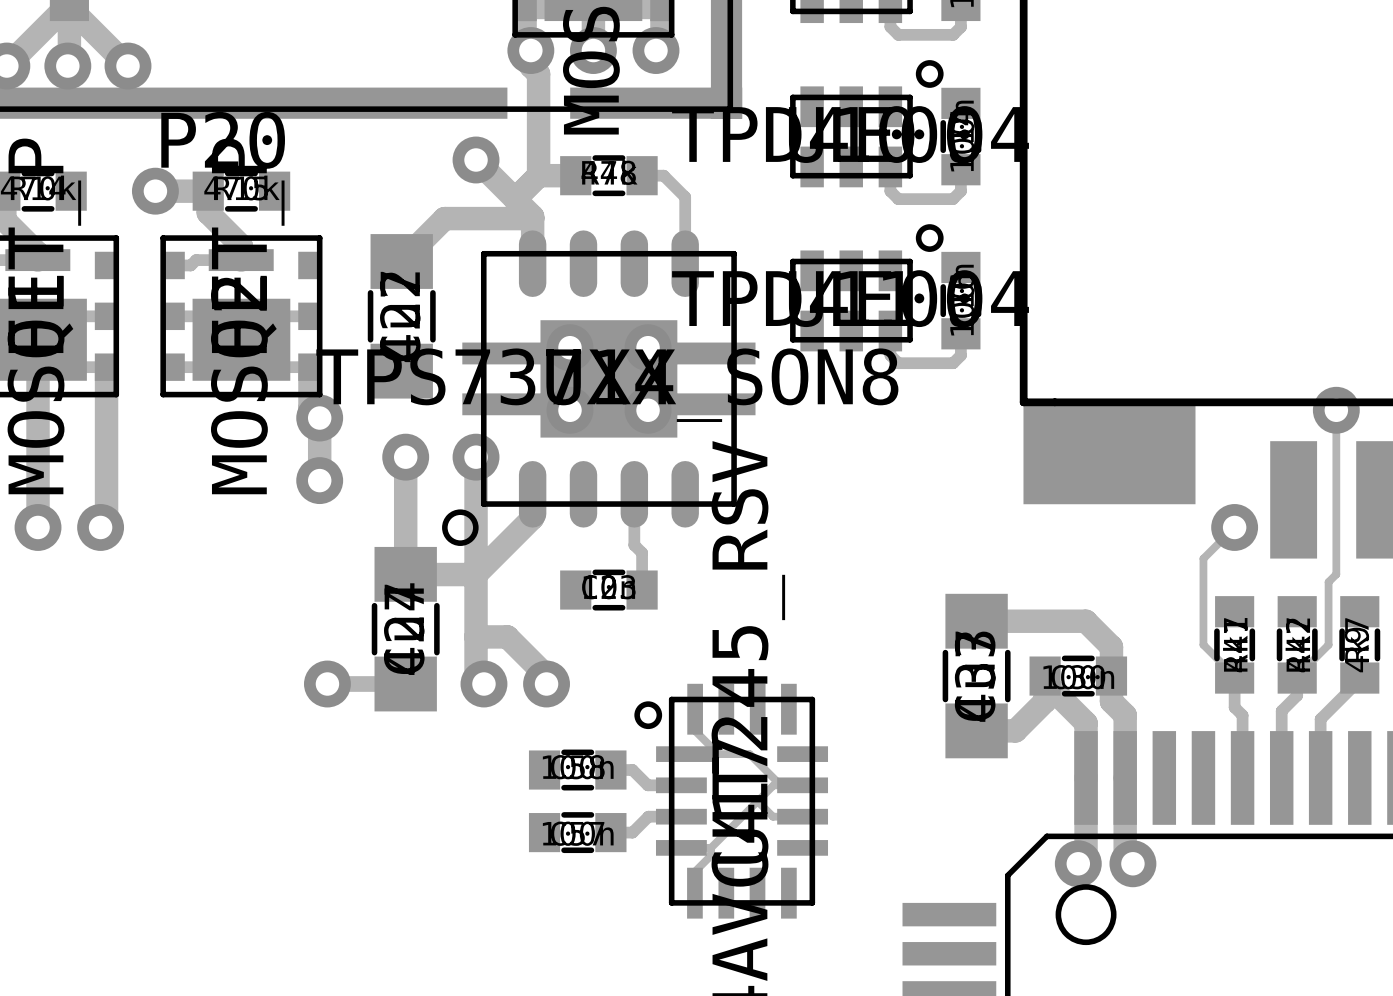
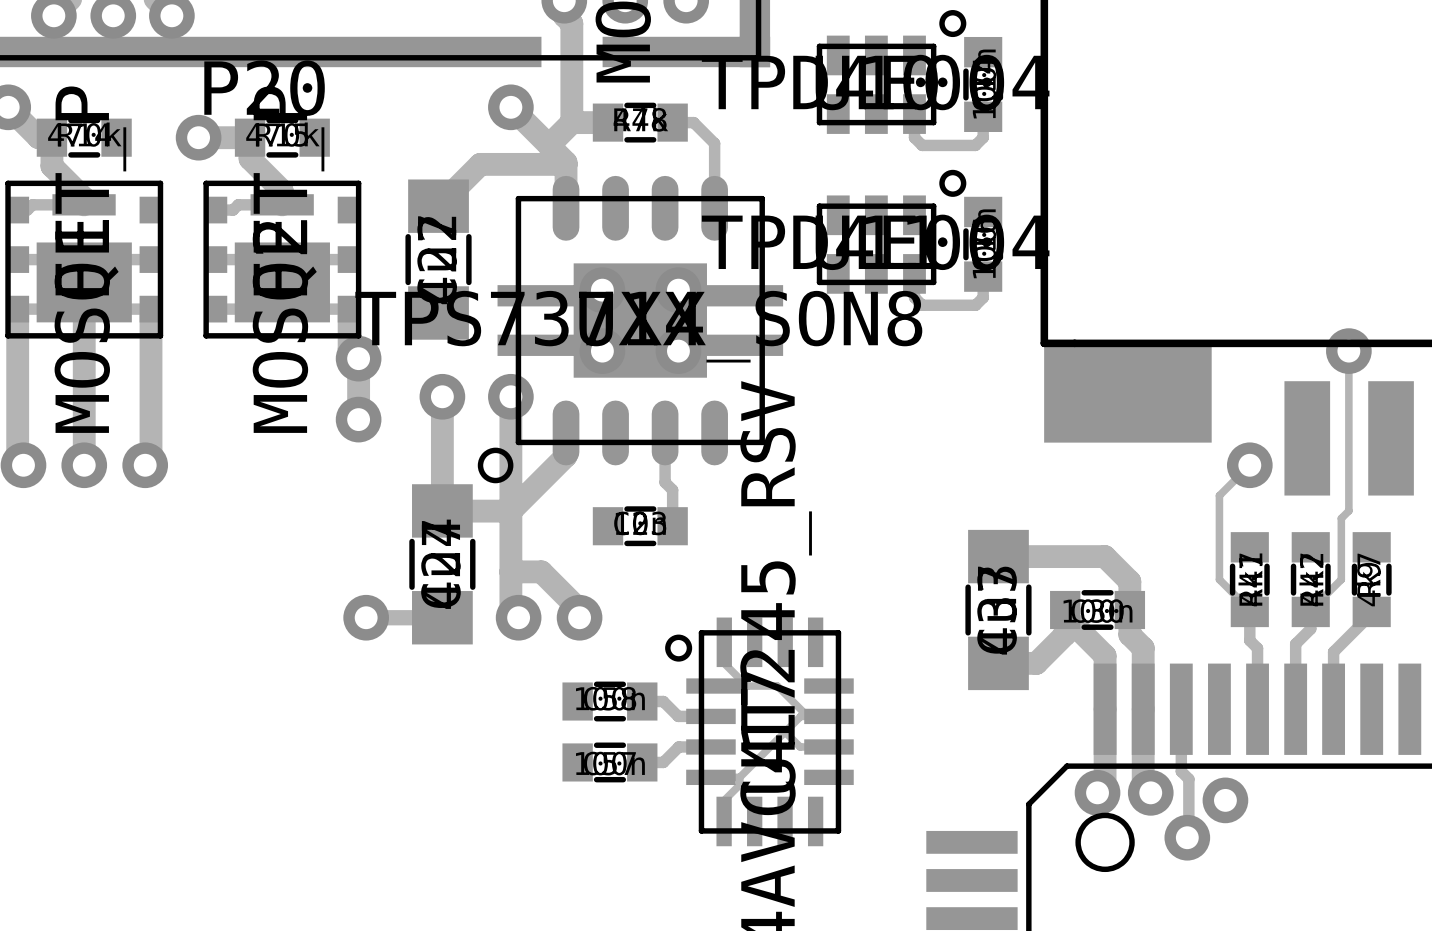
track: none -> (1181, 709) (1181, 771) (1188, 779) (1188, 836) (1187, 837)
via: none -> (1225, 800)
via: none -> (1187, 837)

